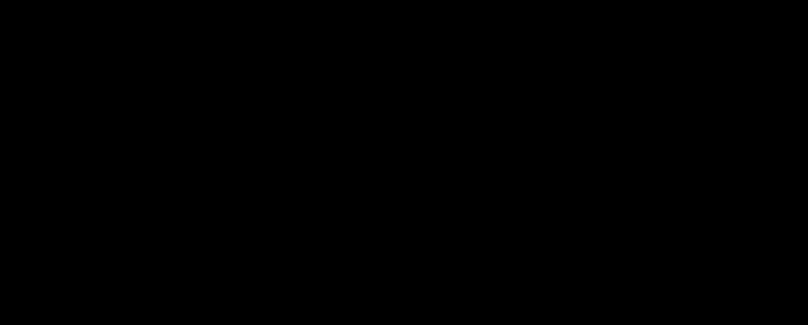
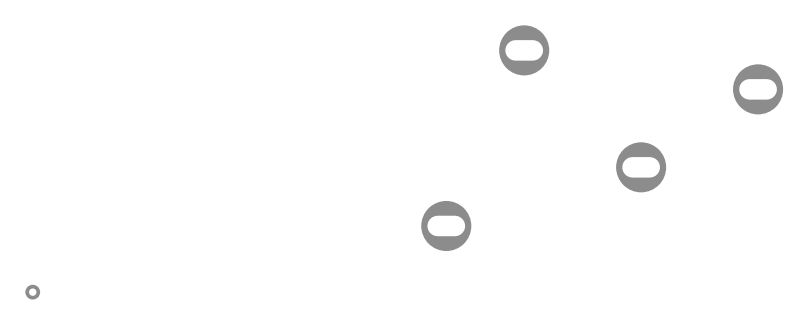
part: none -> (524, 50)
part: none -> (758, 89)
part: none -> (641, 167)
part: none -> (446, 225)
part: none -> (32, 292)

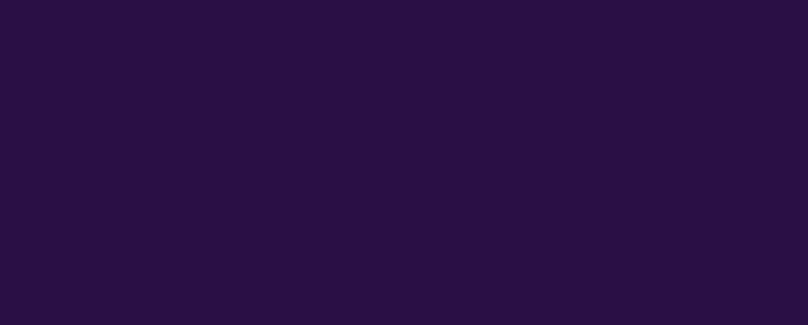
part: (524, 50) -> none
part: (758, 89) -> none
part: (641, 167) -> none
part: (446, 225) -> none
part: (32, 292) -> none

